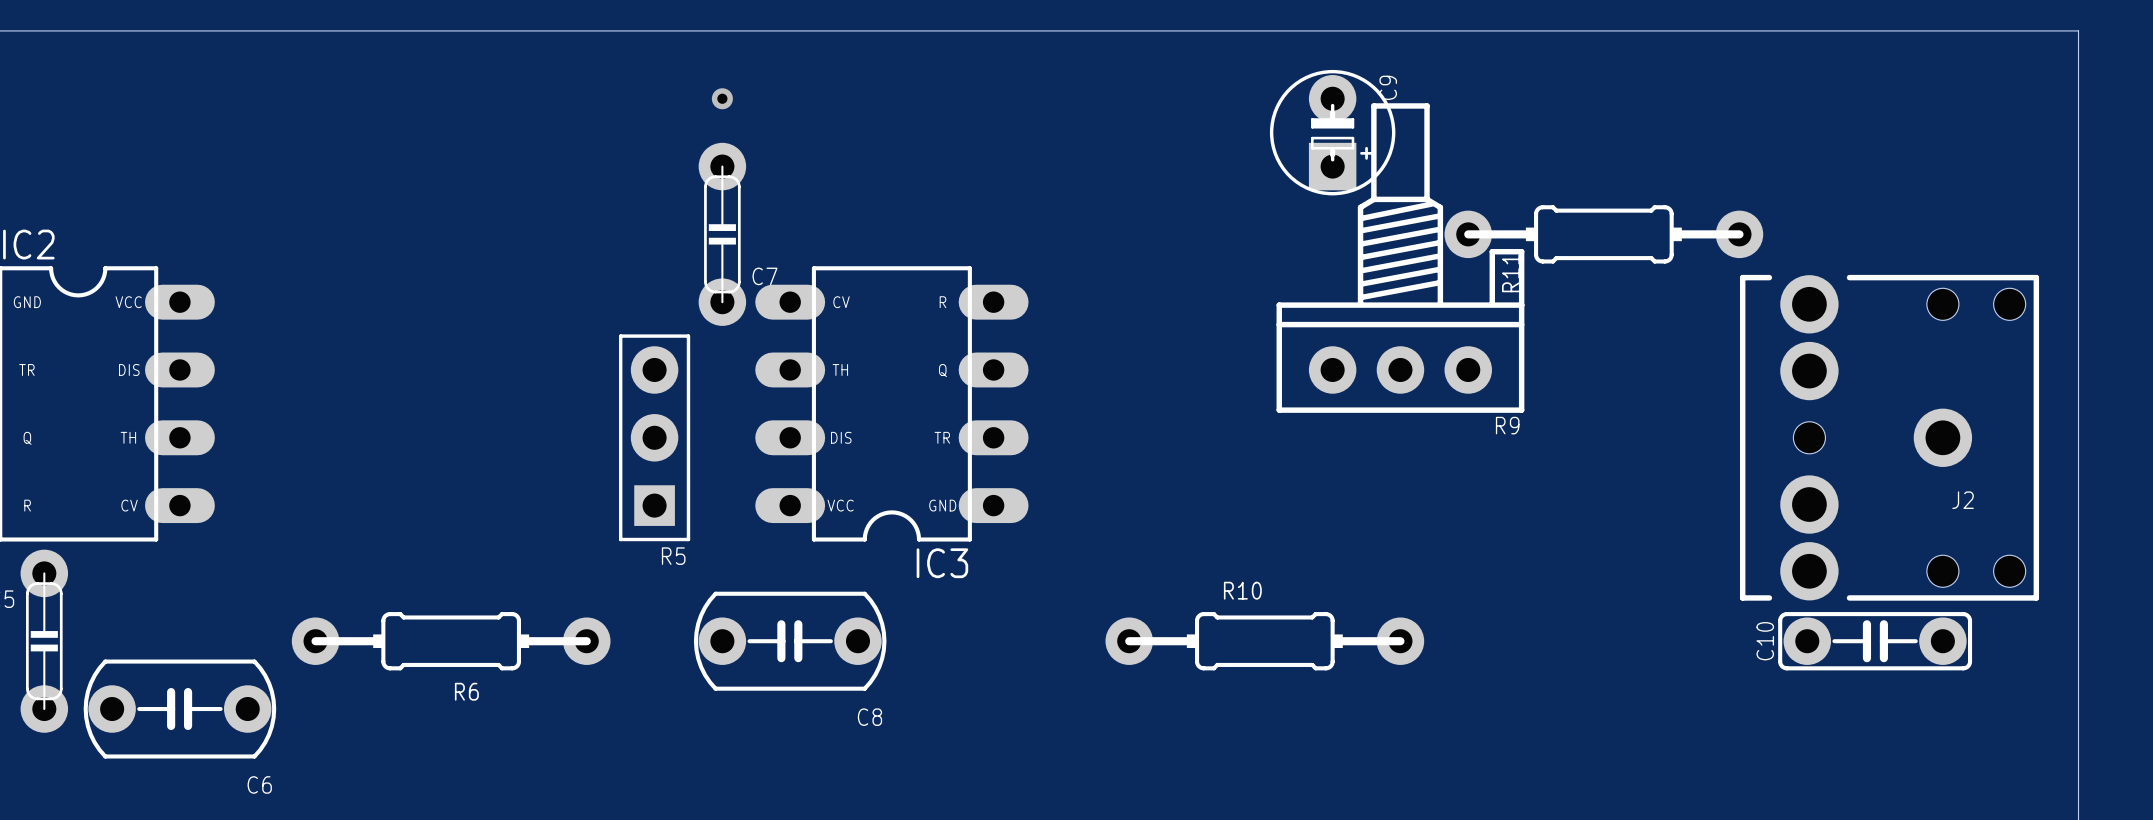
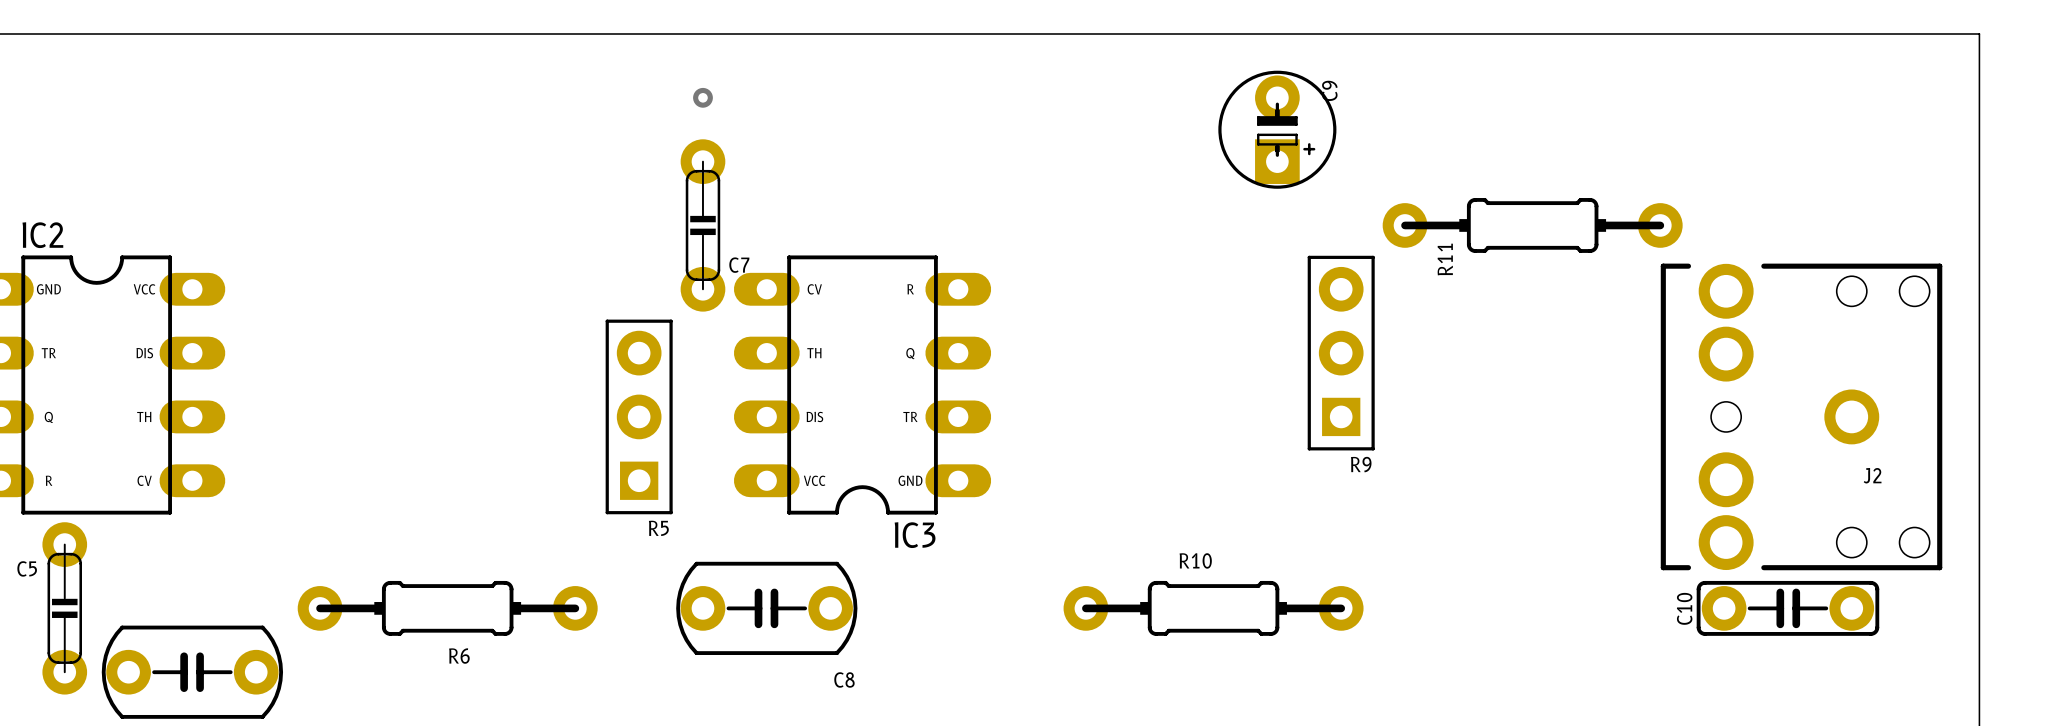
R9 footprint: [1276, 103, 1525, 413] -> [1307, 255, 1375, 451]
R9 name position: R9 (1507, 425) -> R9 (1361, 464)

